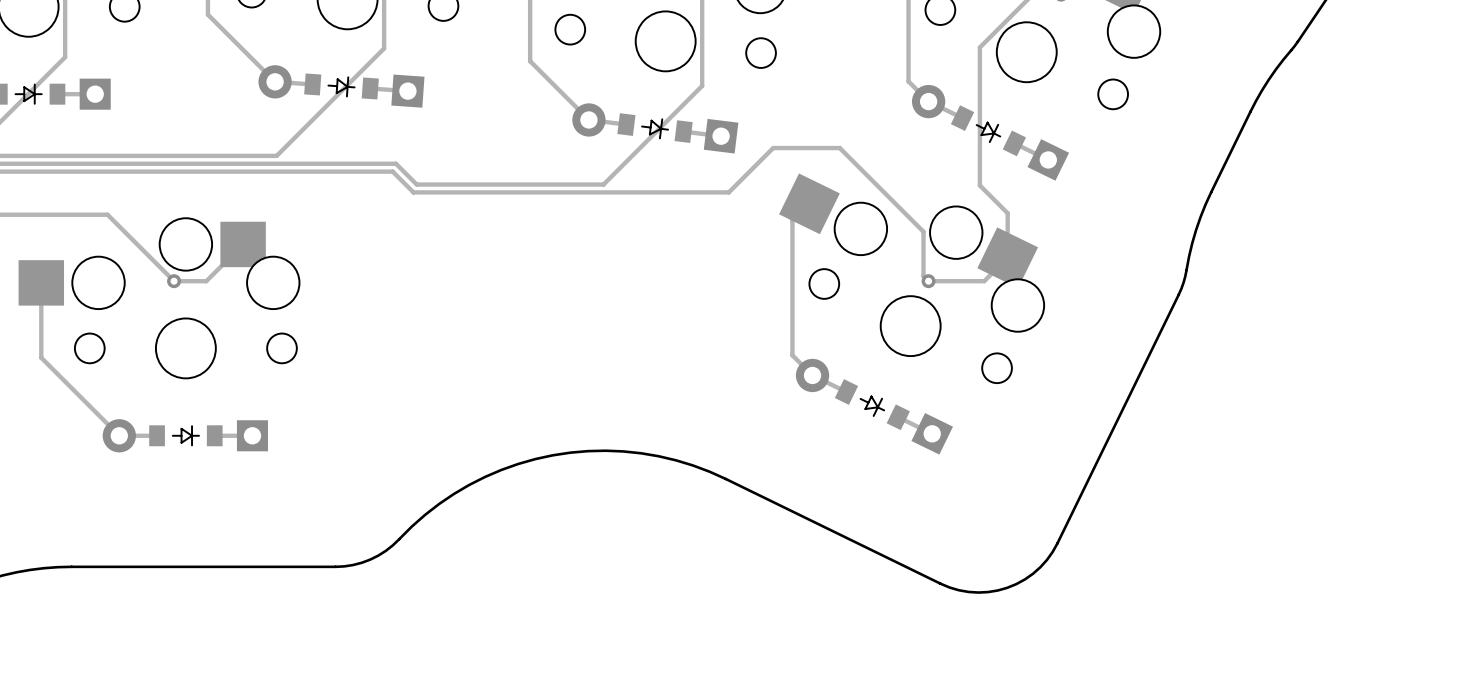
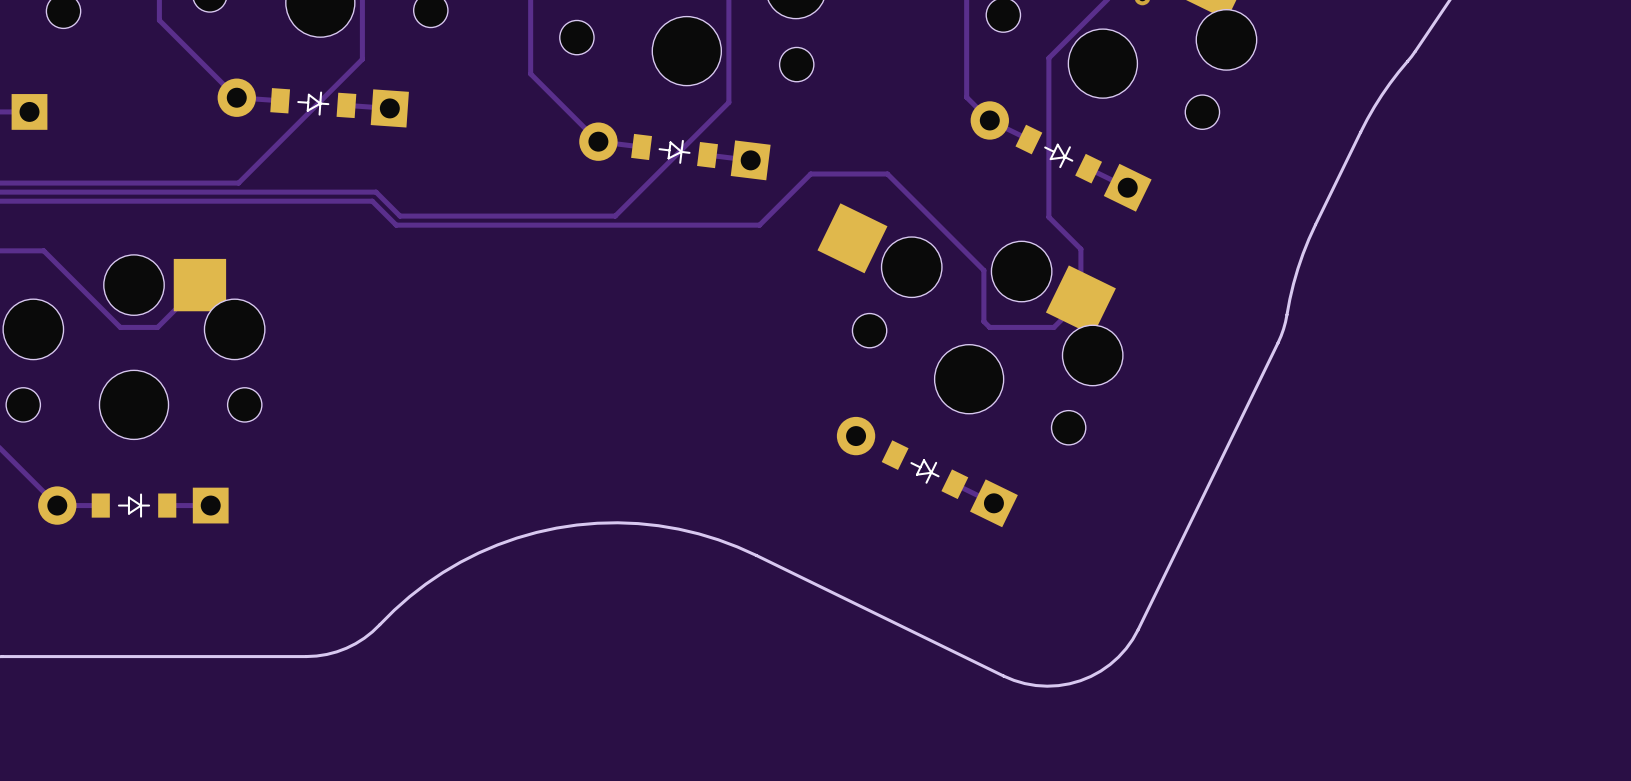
track: (809, 203) (792, 220) (792, 355) (812, 375) (846, 392) -> none
via: (174, 281) -> none
via: (928, 281) -> none

